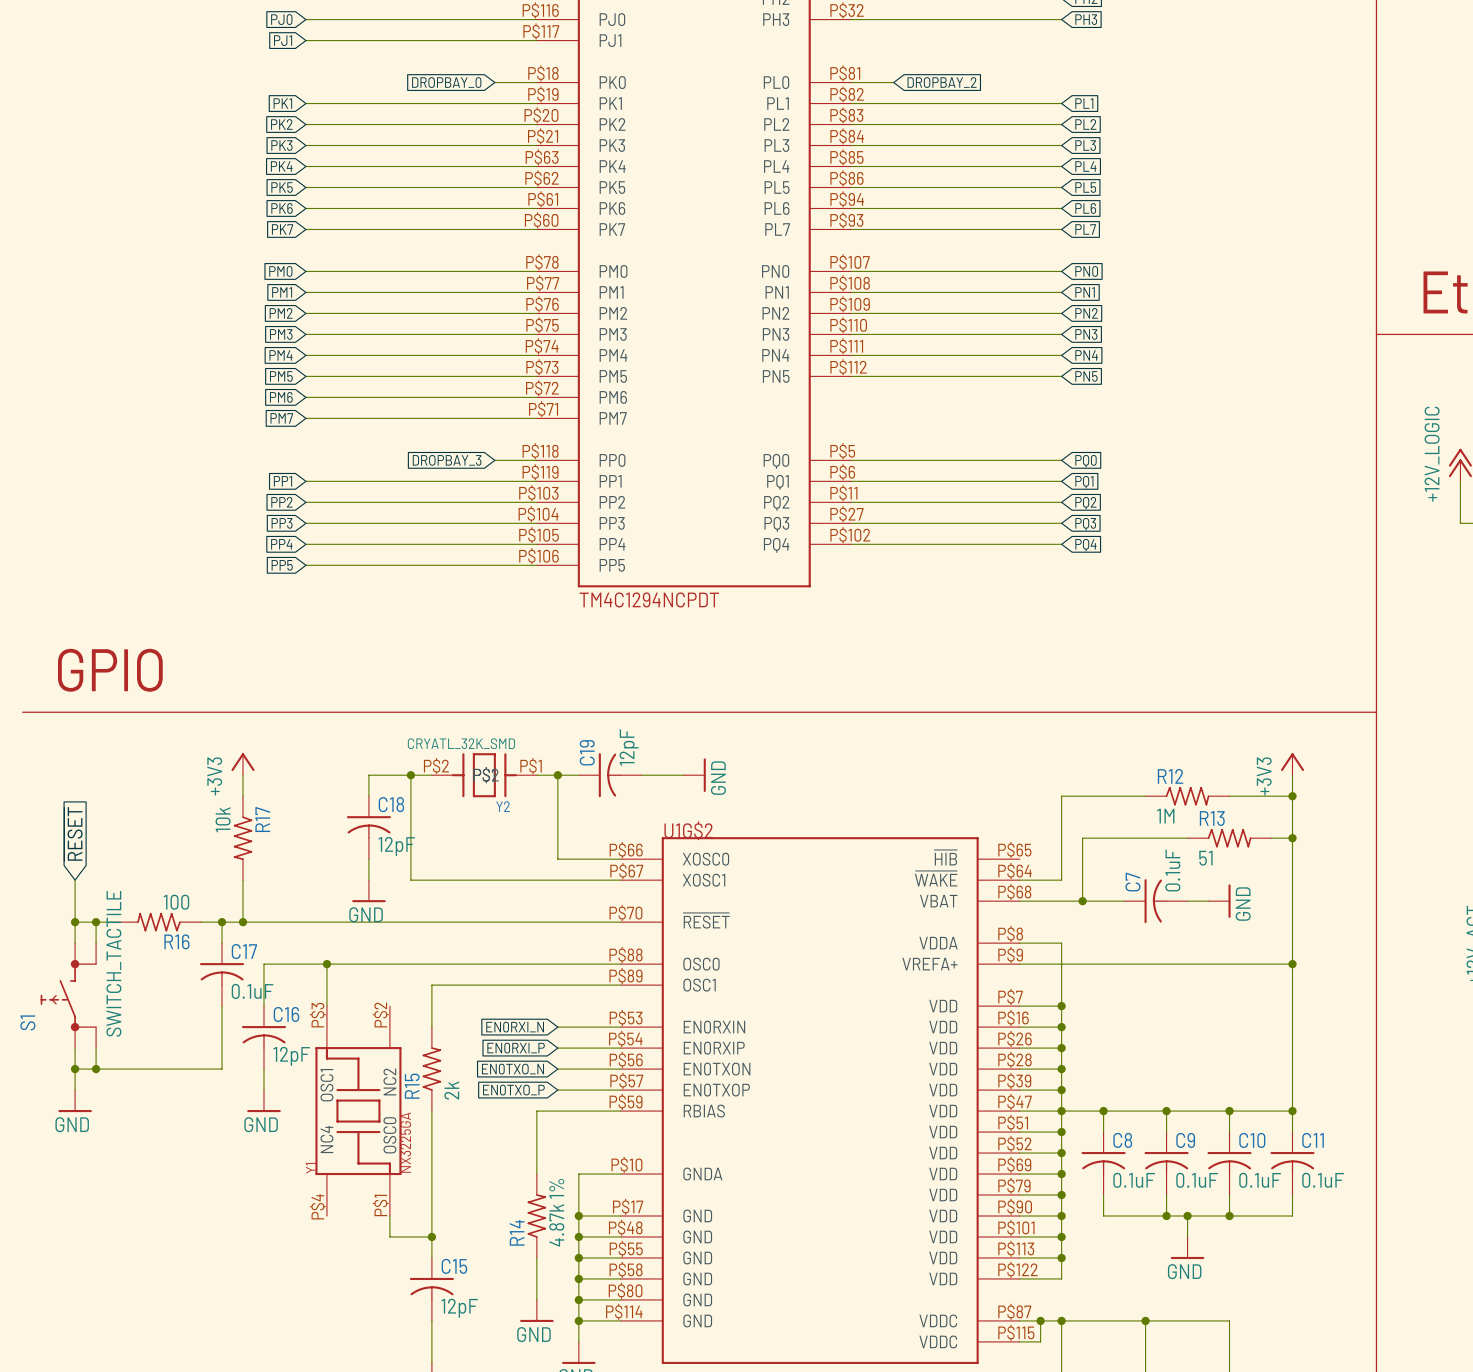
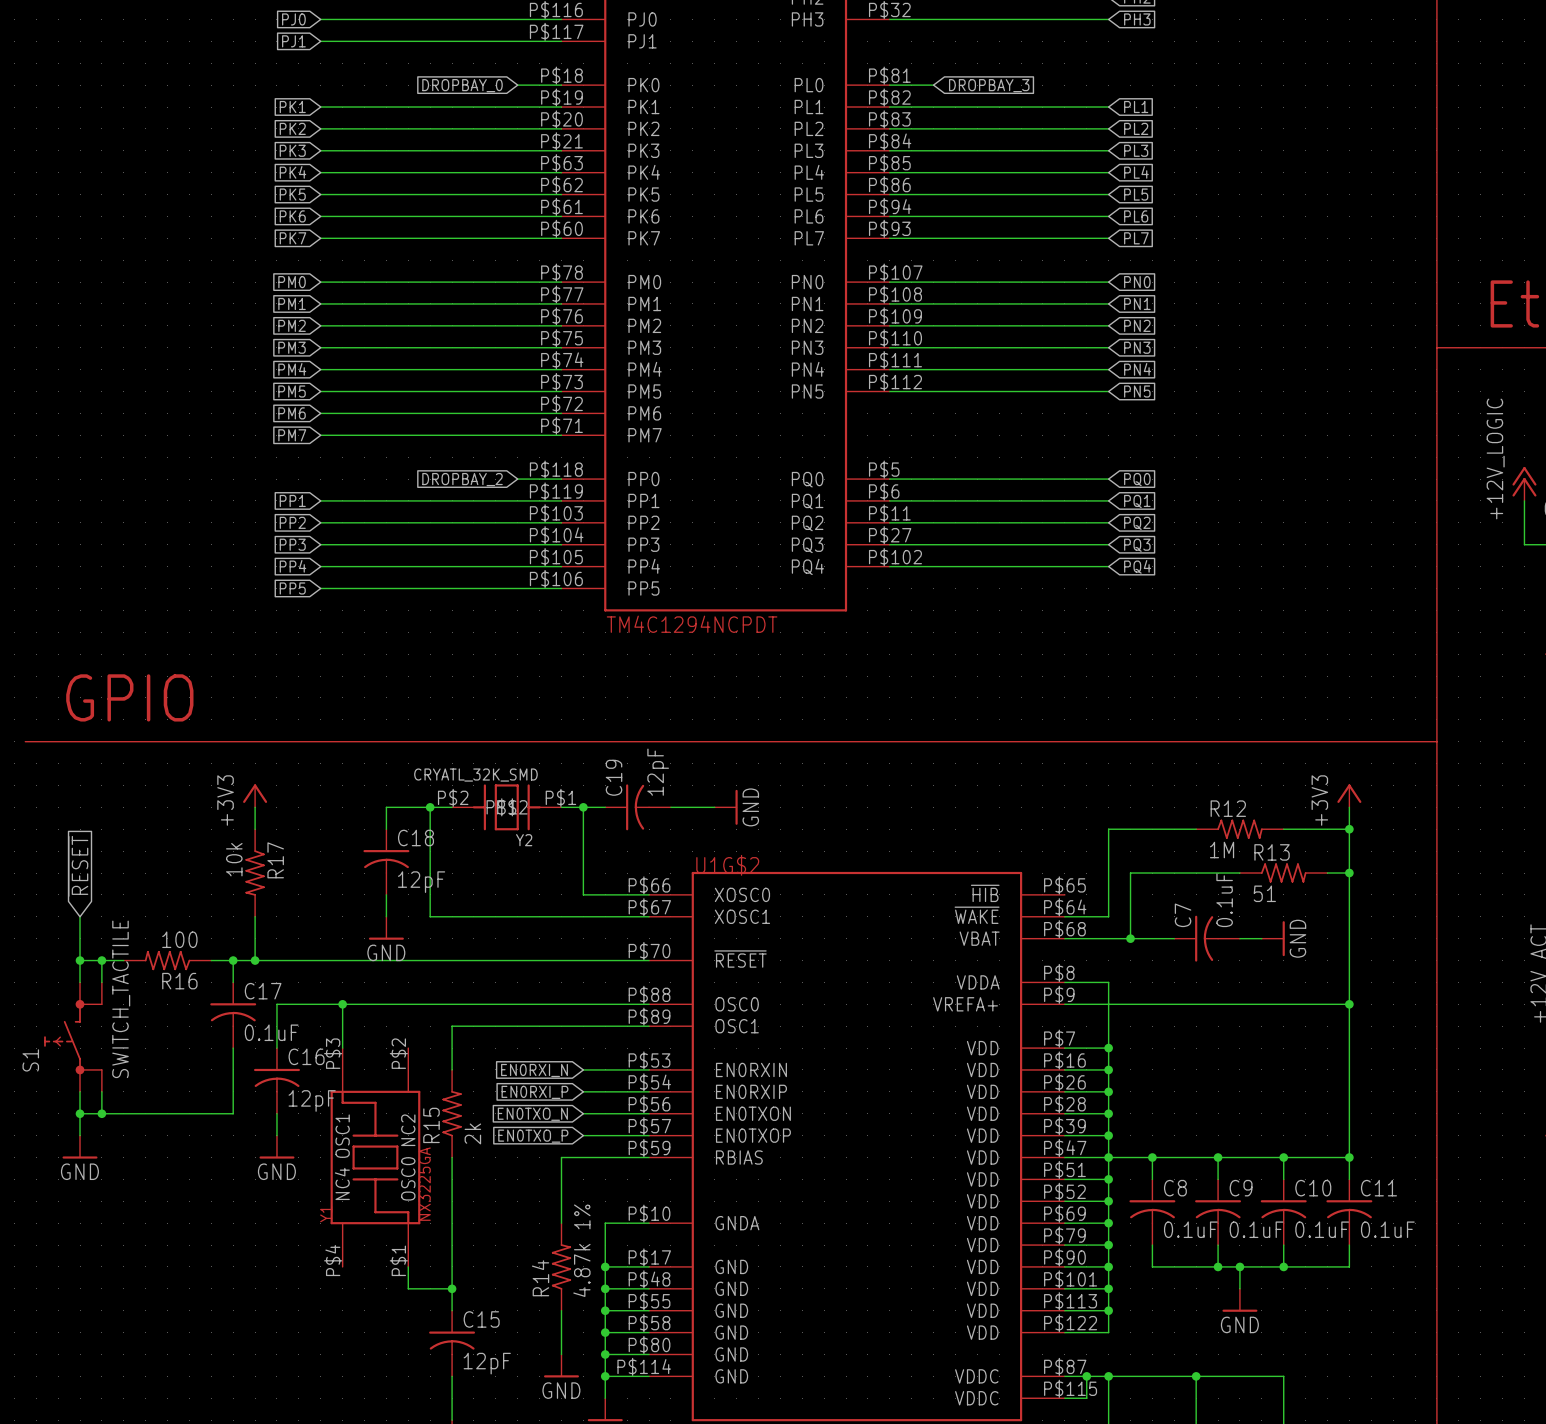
global label: DROPBAY_2 (942, 82) -> DROPBAY_3 (989, 85)
global label: DROPBAY_3 (447, 460) -> DROPBAY_2 (462, 479)

